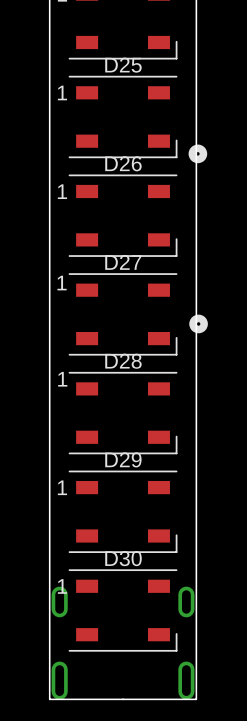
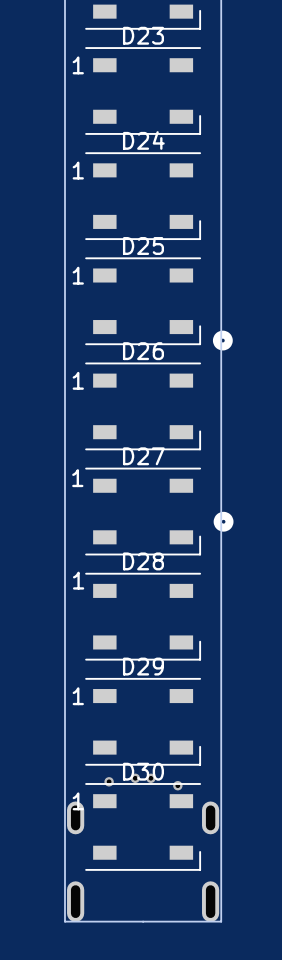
via: none -> (135, 778)
via: none -> (150, 778)
via: none -> (109, 781)
via: none -> (177, 785)

